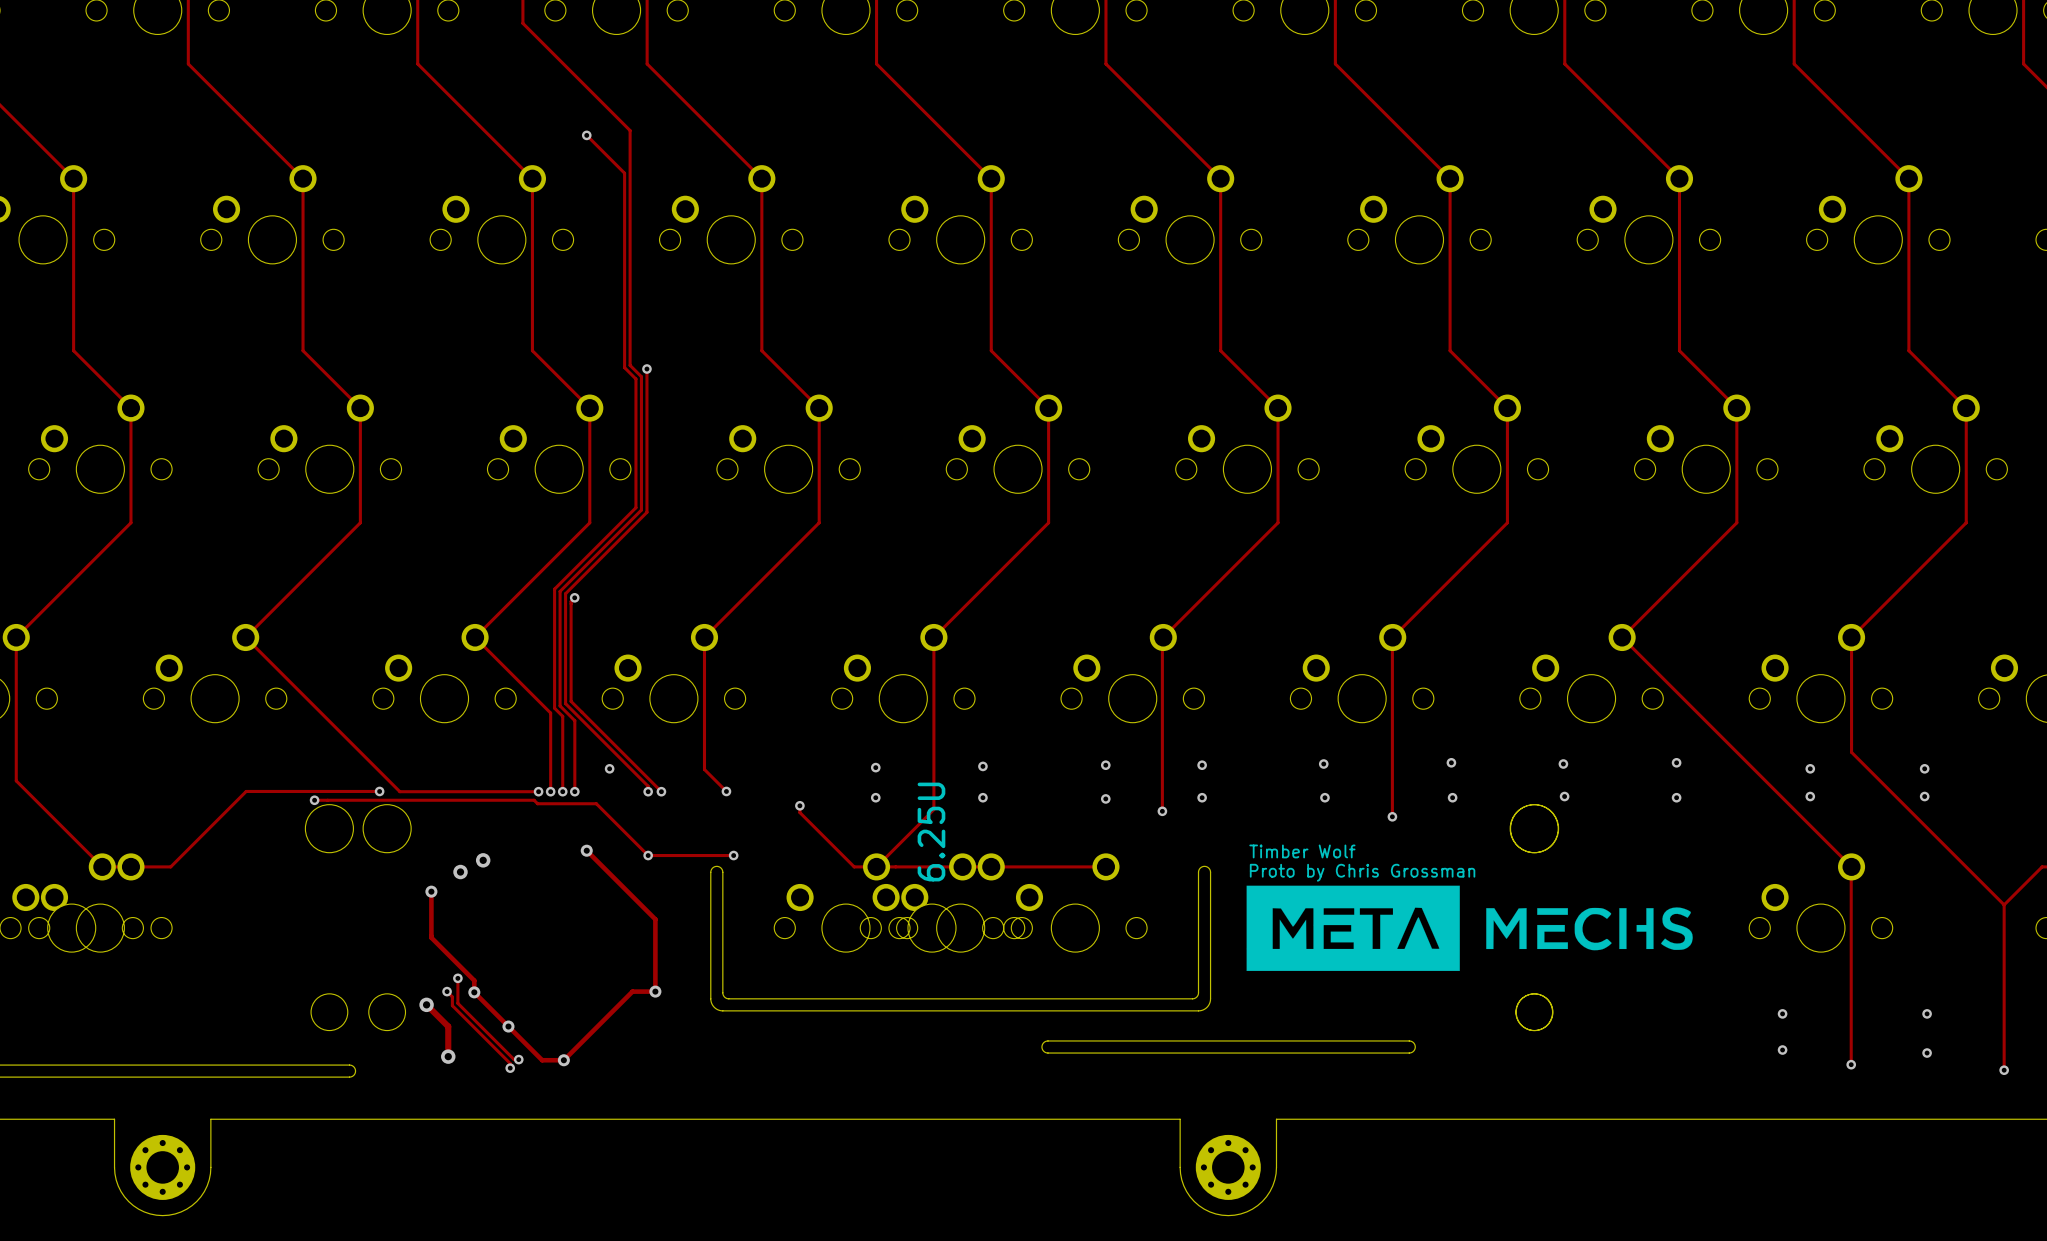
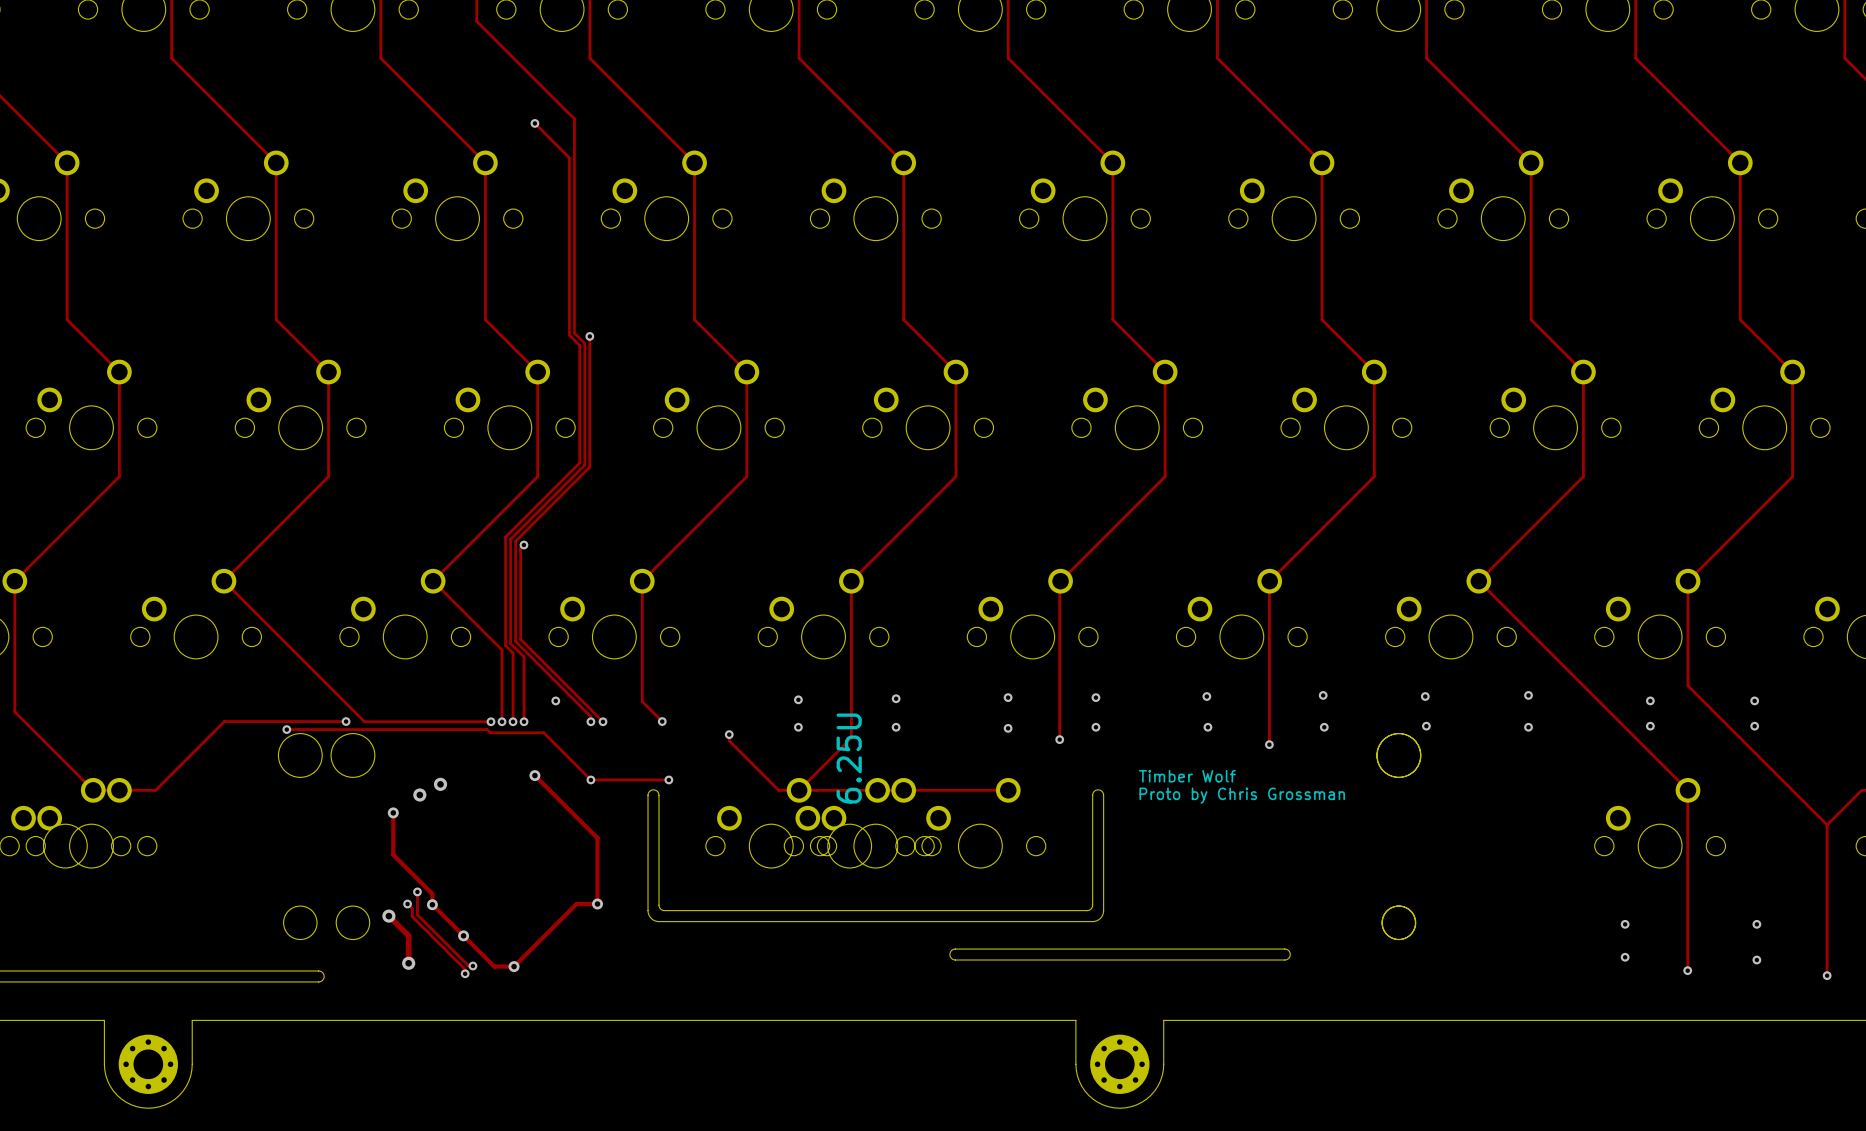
drawing: [1246, 885, 1693, 971] -> none

